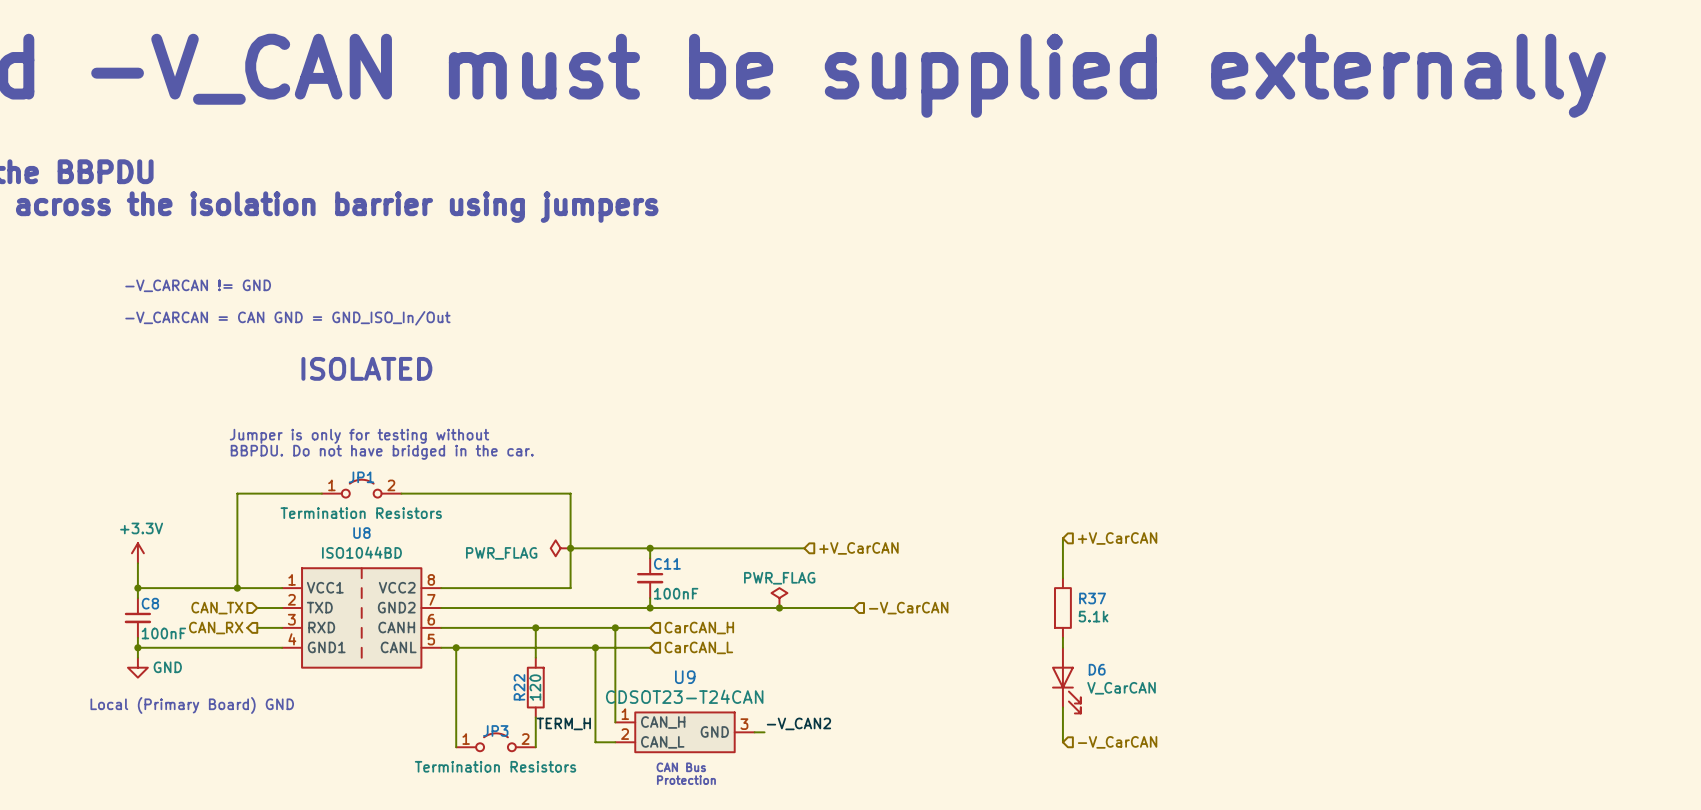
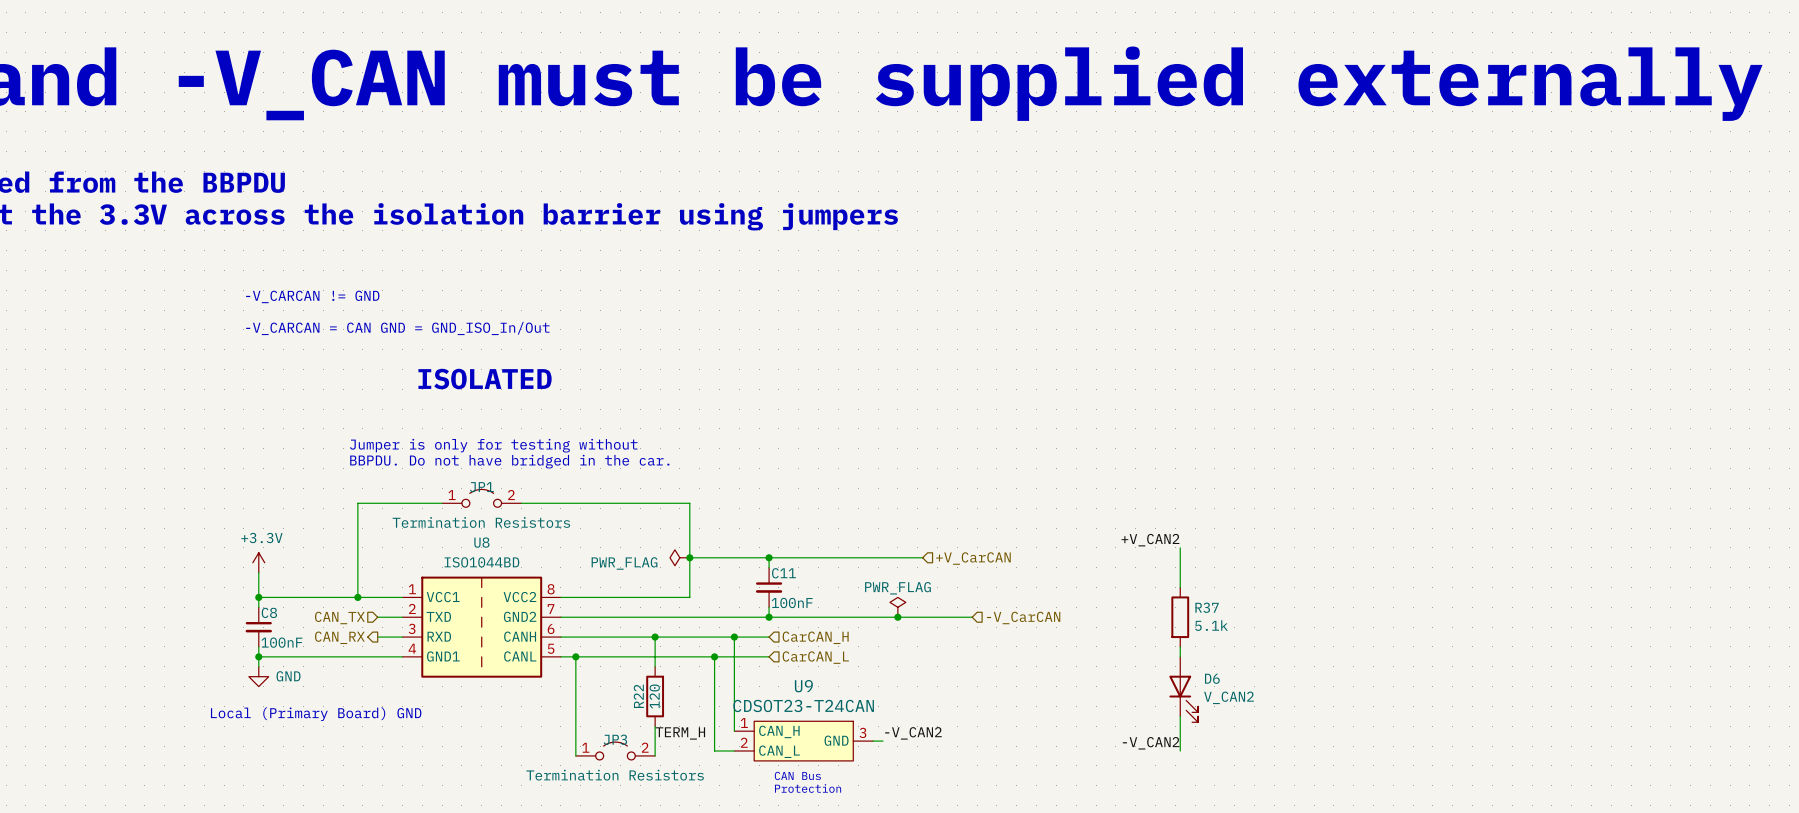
label: none -> +V_CAN2 (1150, 540)
hierarchical label: +V_CarCAN (1117, 538) -> none
D6 value: V_CarCAN (1121, 688) -> V_CAN2 (1229, 697)
label: none -> -V_CAN2 (1151, 743)
hierarchical label: -V_CarCAN (1117, 742) -> none

